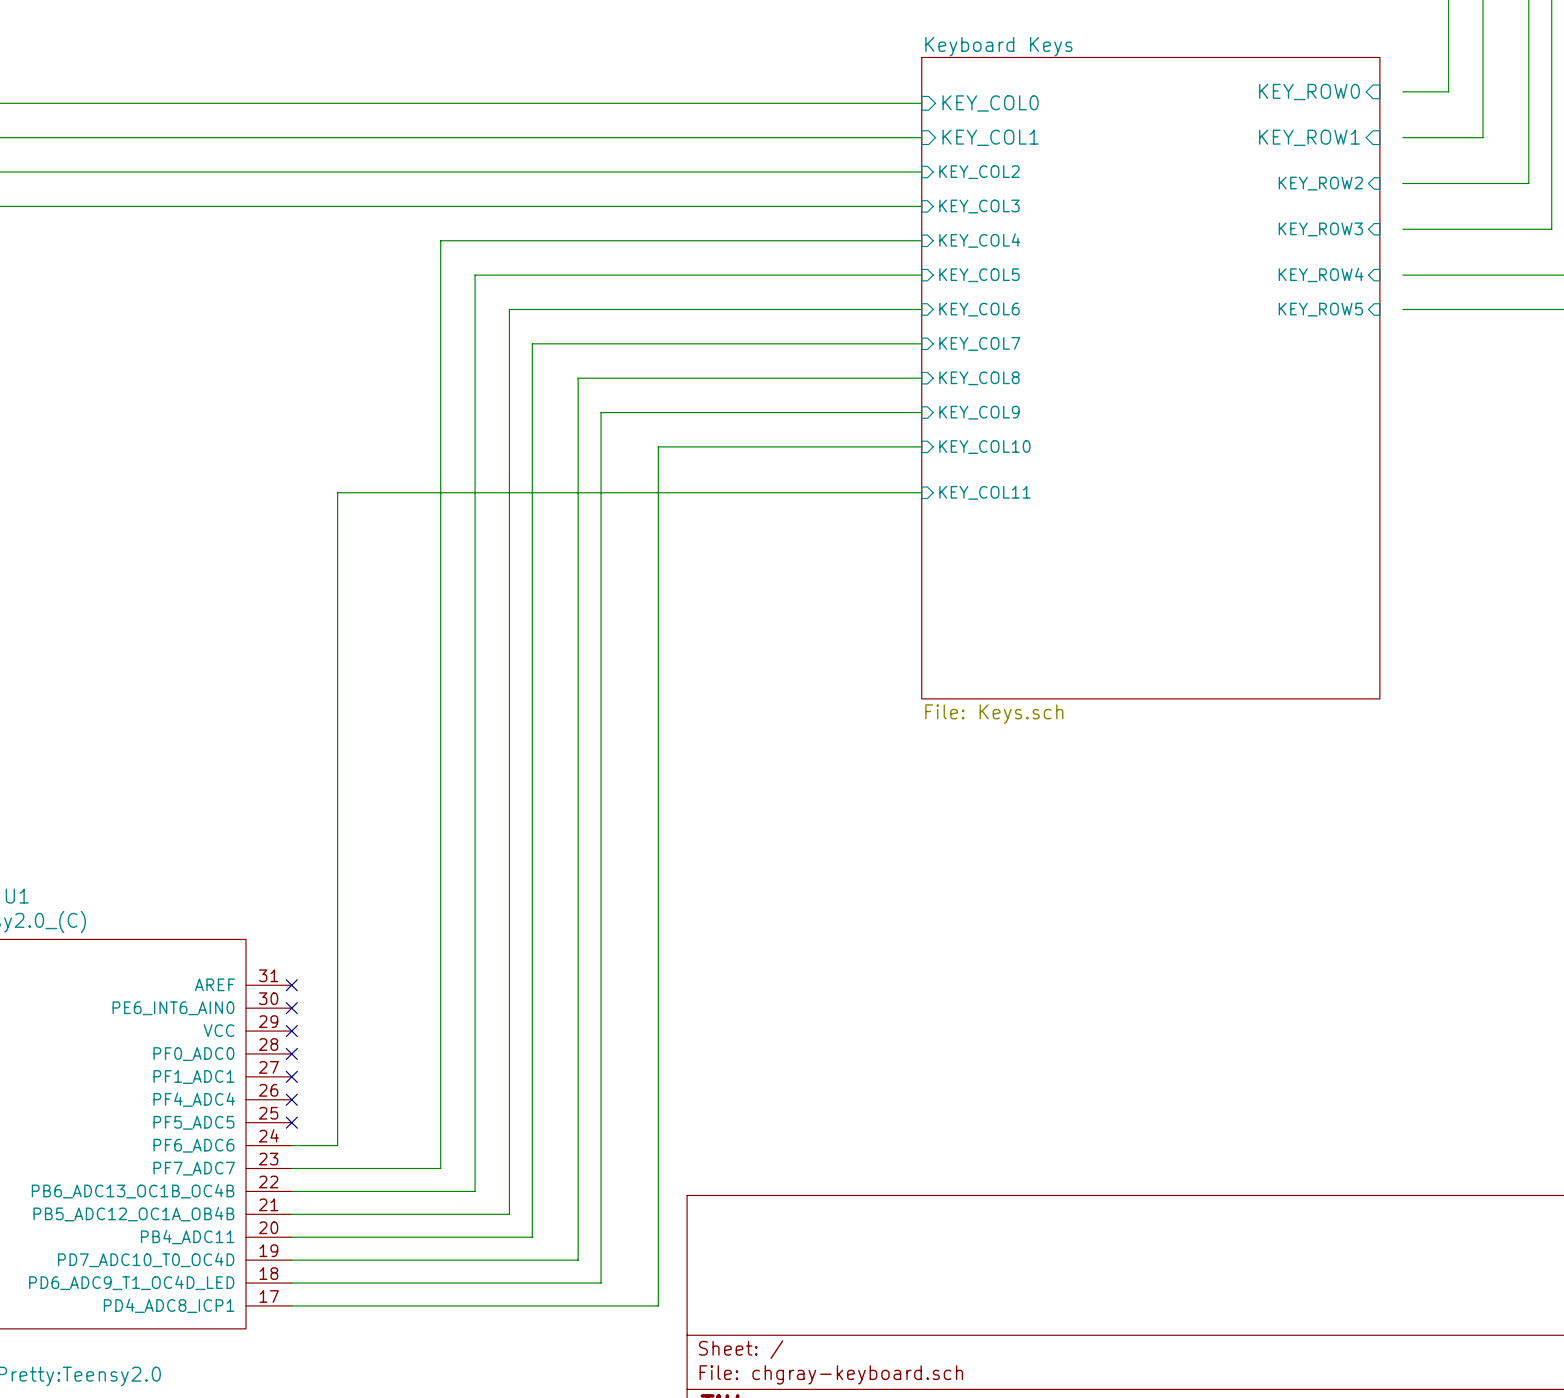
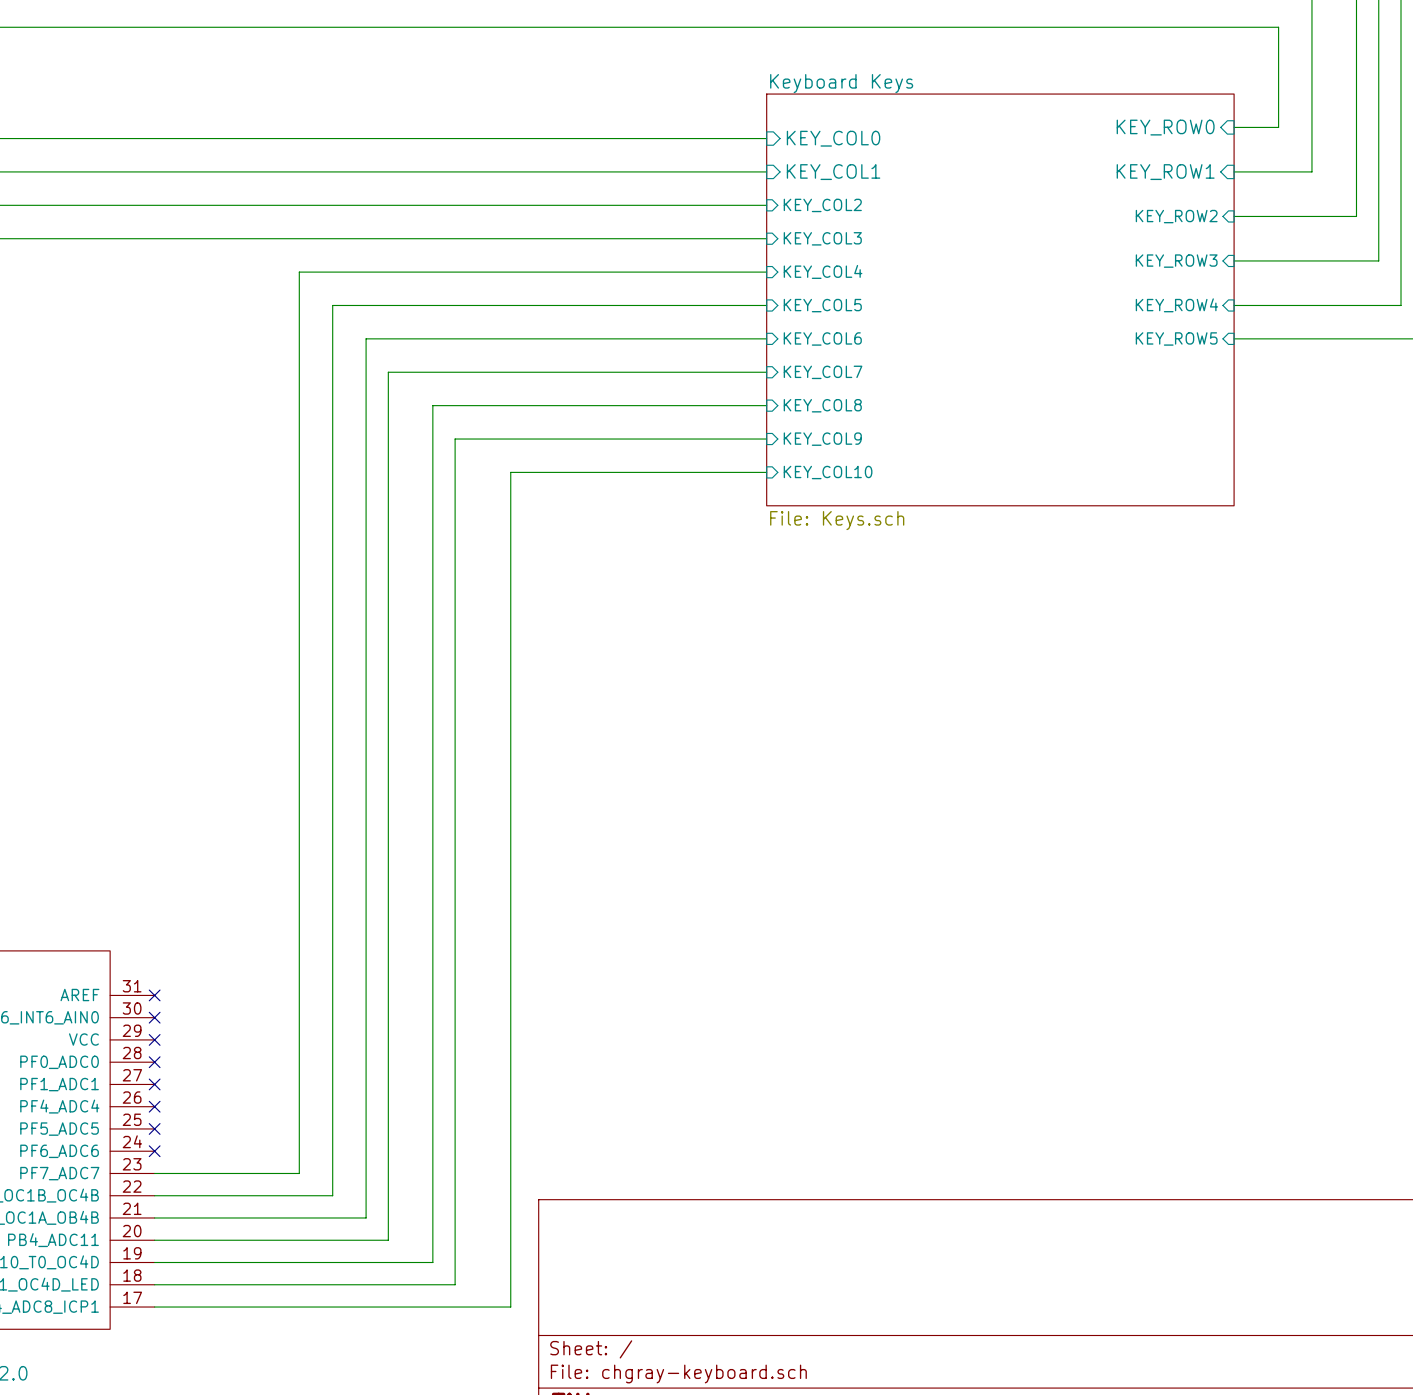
sheet pin position: KEY_ROW0 (1309, 91) -> KEY_ROW0 (1165, 127)
sheet pin position: KEY_ROW1 (1309, 137) -> KEY_ROW1 (1165, 172)
sheet pin position: KEY_ROW2 (1320, 183) -> KEY_ROW2 (1176, 216)
sheet pin position: KEY_ROW3 (1320, 229) -> KEY_ROW3 (1176, 261)
sheet Keyboard Keys: none -> File: Keys.sch (1000, 299)
sheet pin position: KEY_ROW4 (1321, 274) -> KEY_ROW4 (1176, 305)
sheet pin position: KEY_ROW5 (1320, 309) -> KEY_ROW5 (1176, 338)
sheet Keyboard Keys: File: Keys.sch (1150, 378) -> none
wire: (921, 492) (337, 492) (337, 1145) (291, 1145) -> none
sheet pin: KEY_COL11 (984, 492) -> none
no-connect mark: none -> (154, 1151)

